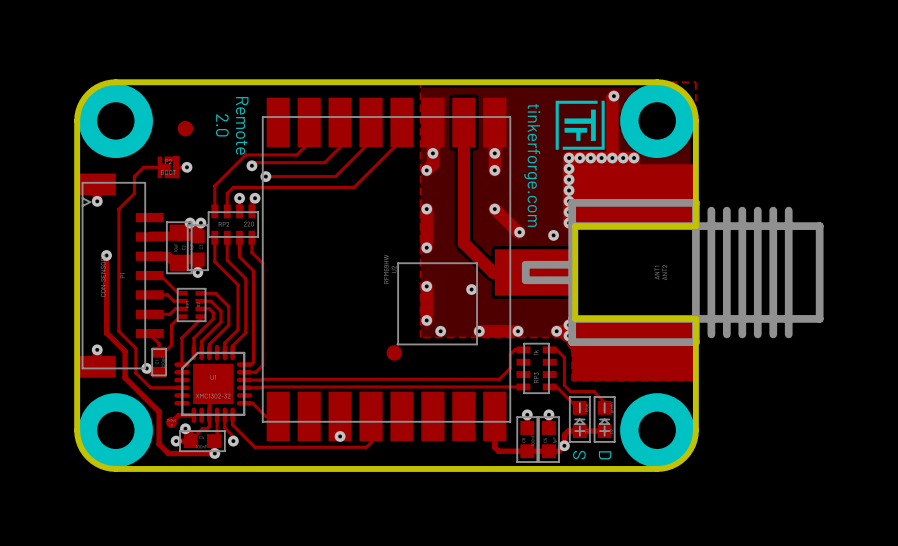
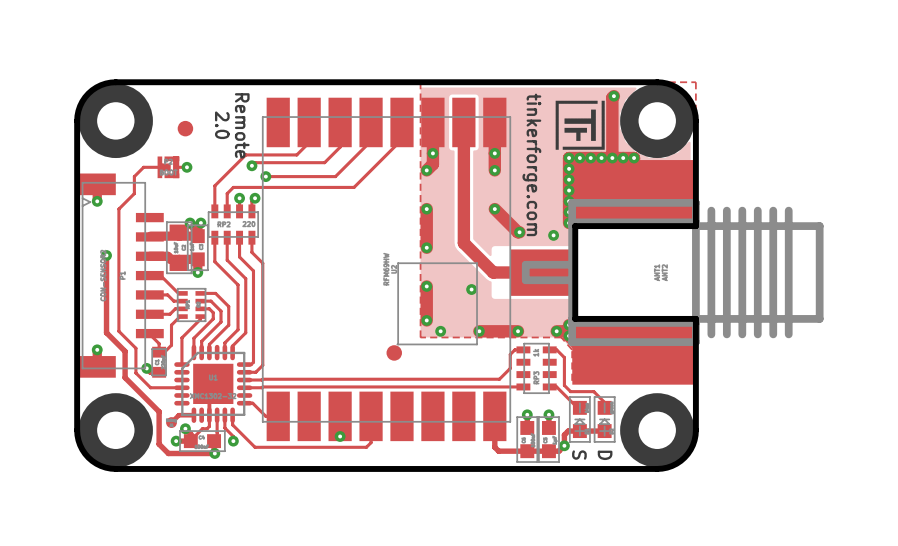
part footprint: [494, 164, 824, 381] -> [510, 160, 824, 385]

